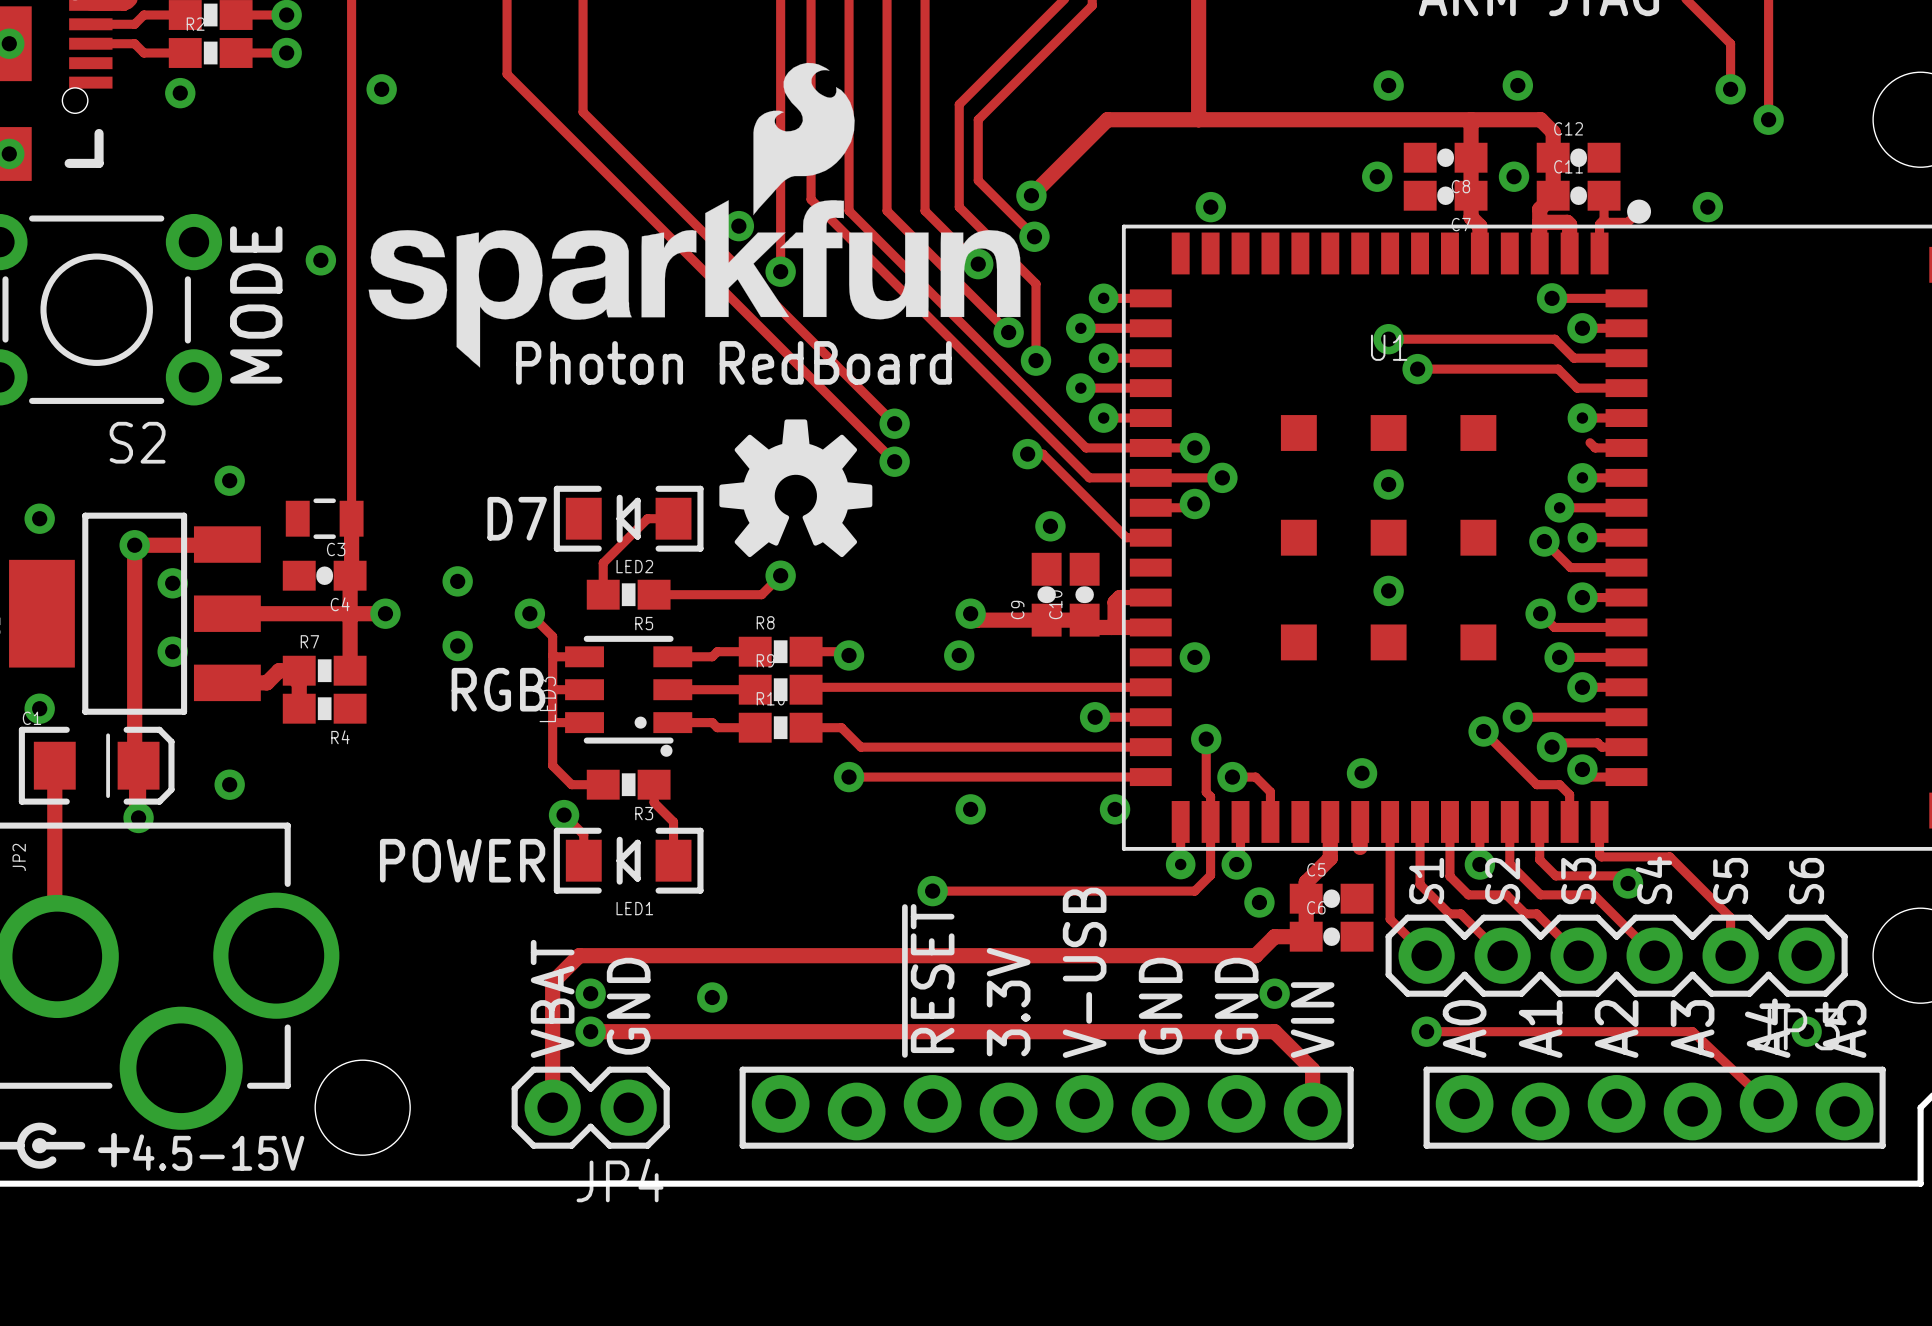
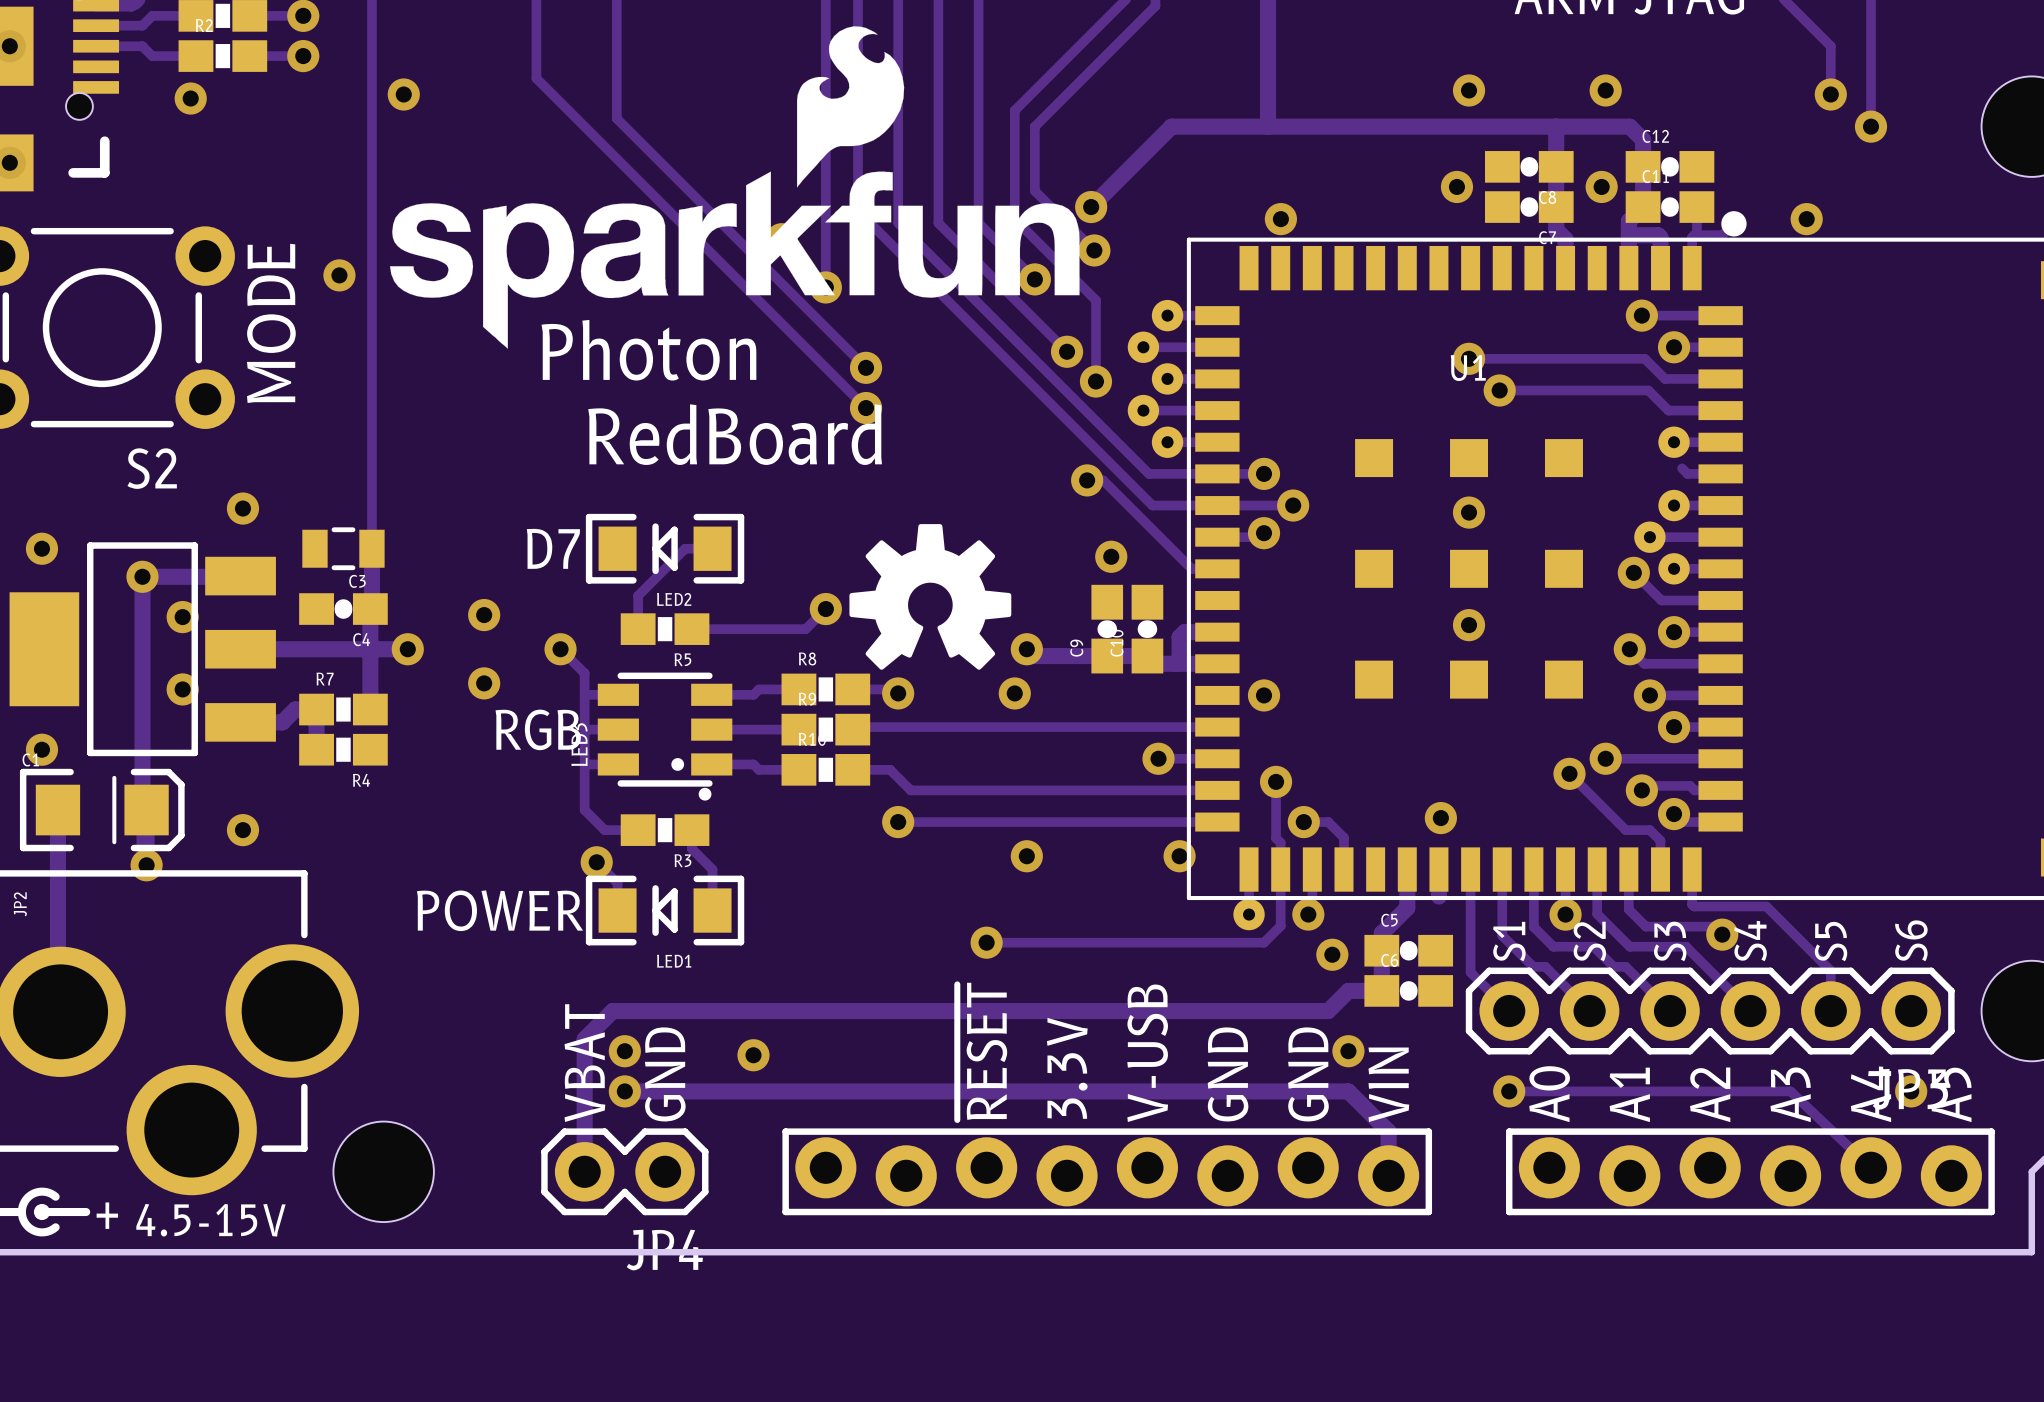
drawing position: (694, 215) -> (734, 187)
text: none -> Photon (648, 350)
track: (818, 347) (894, 423) -> none
via: none -> (866, 367)
text: Photon RedBoard (733, 362) -> RedBoard (735, 434)
track: (818, 385) (894, 461) -> none
via: none -> (866, 408)
via: (894, 423) -> none
via: (894, 461) -> none
drawing position: (795, 488) -> (930, 596)

